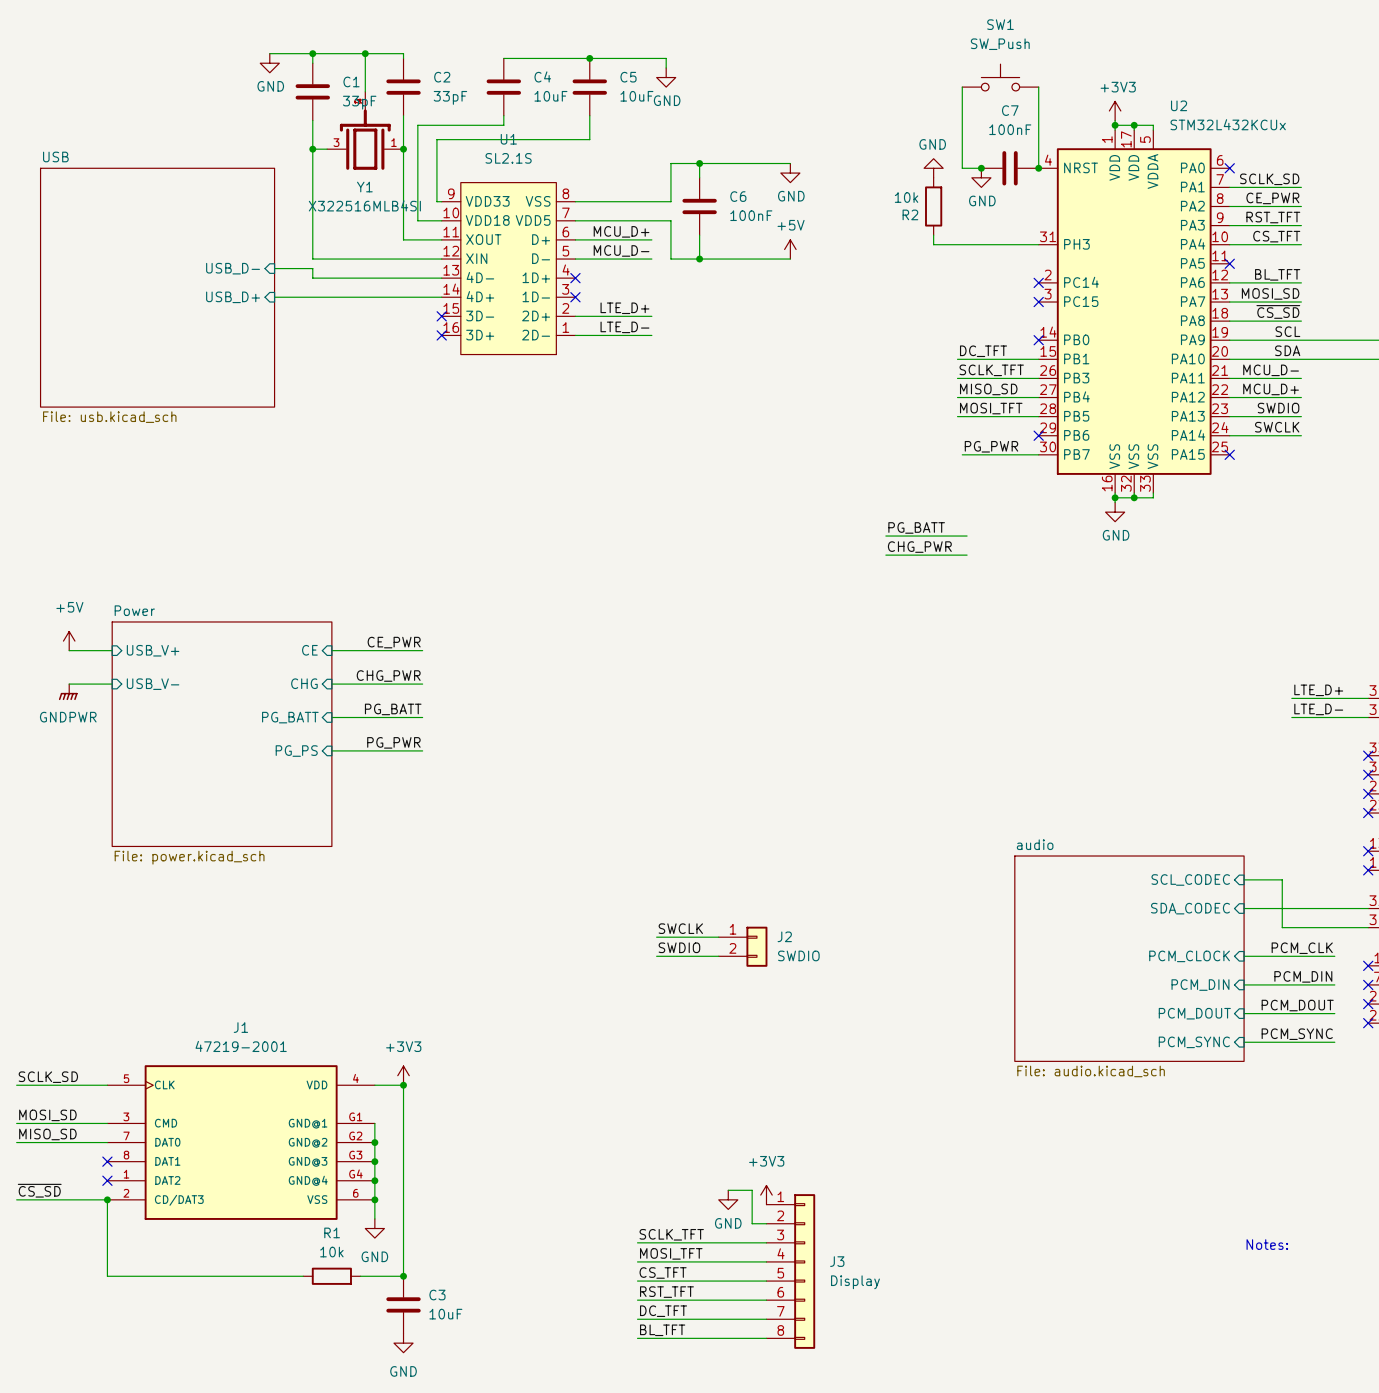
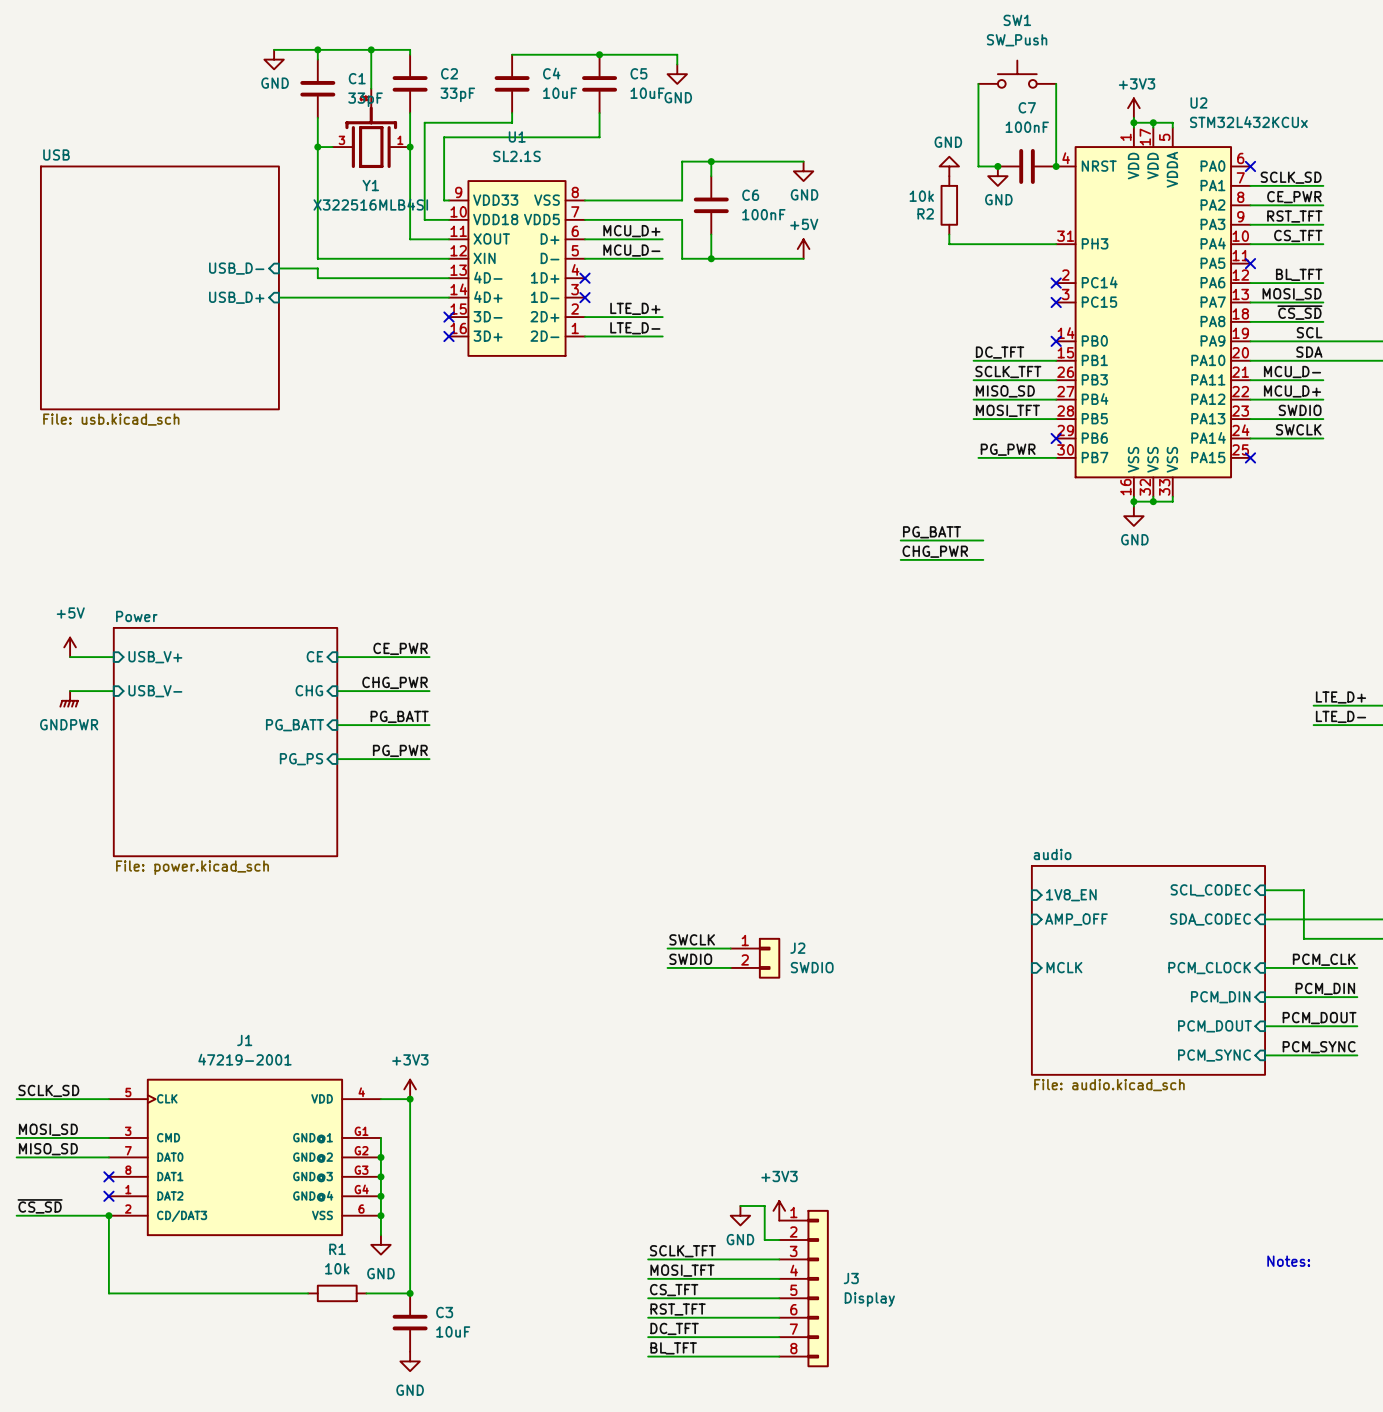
sheet pin: none -> 1V8_EN (1071, 895)
sheet pin: none -> AMP_OFF (1076, 919)
sheet pin: none -> MCLK (1064, 967)

